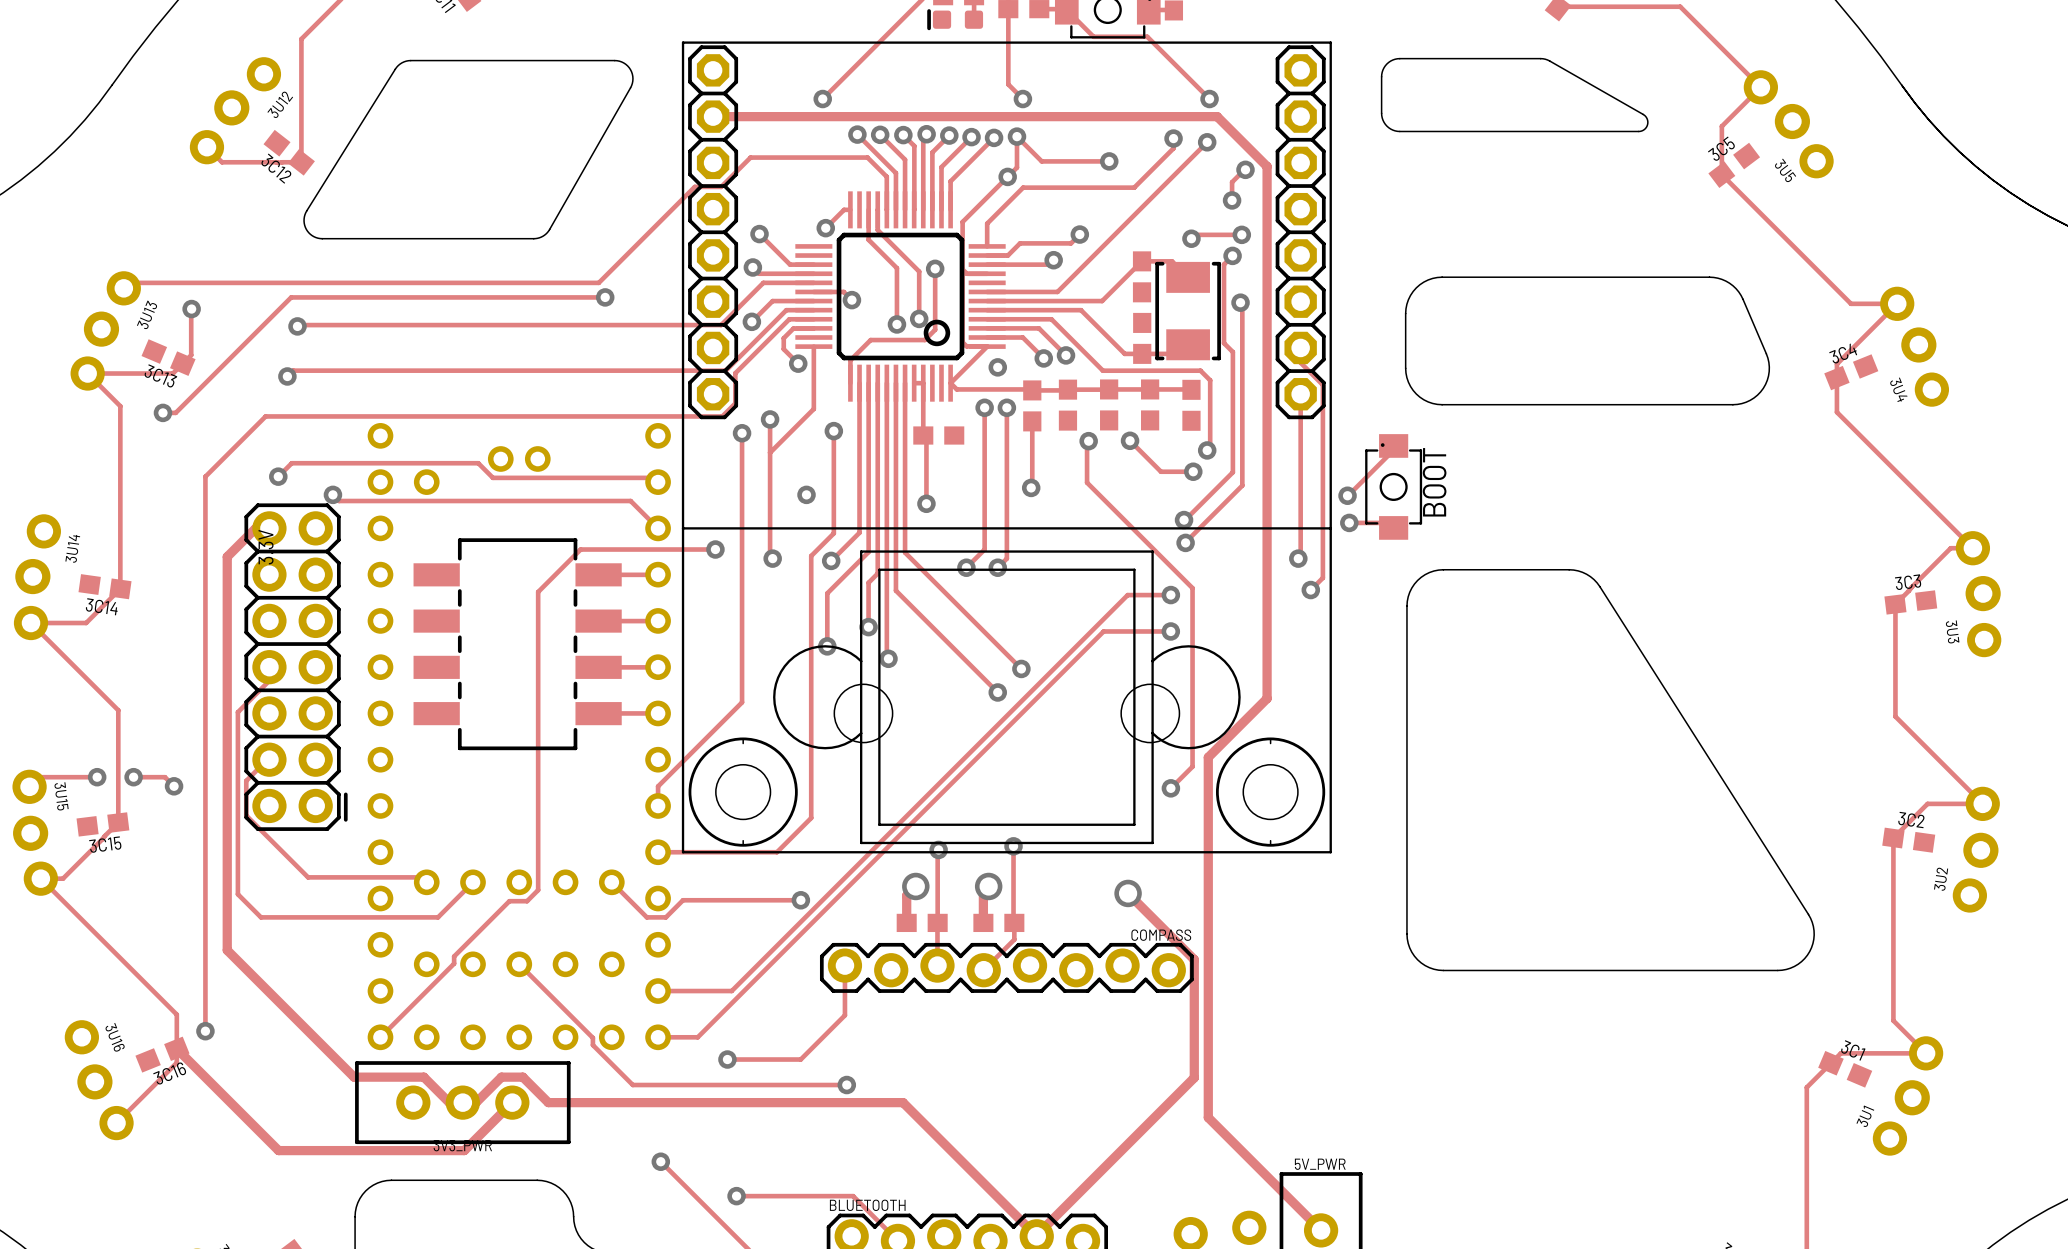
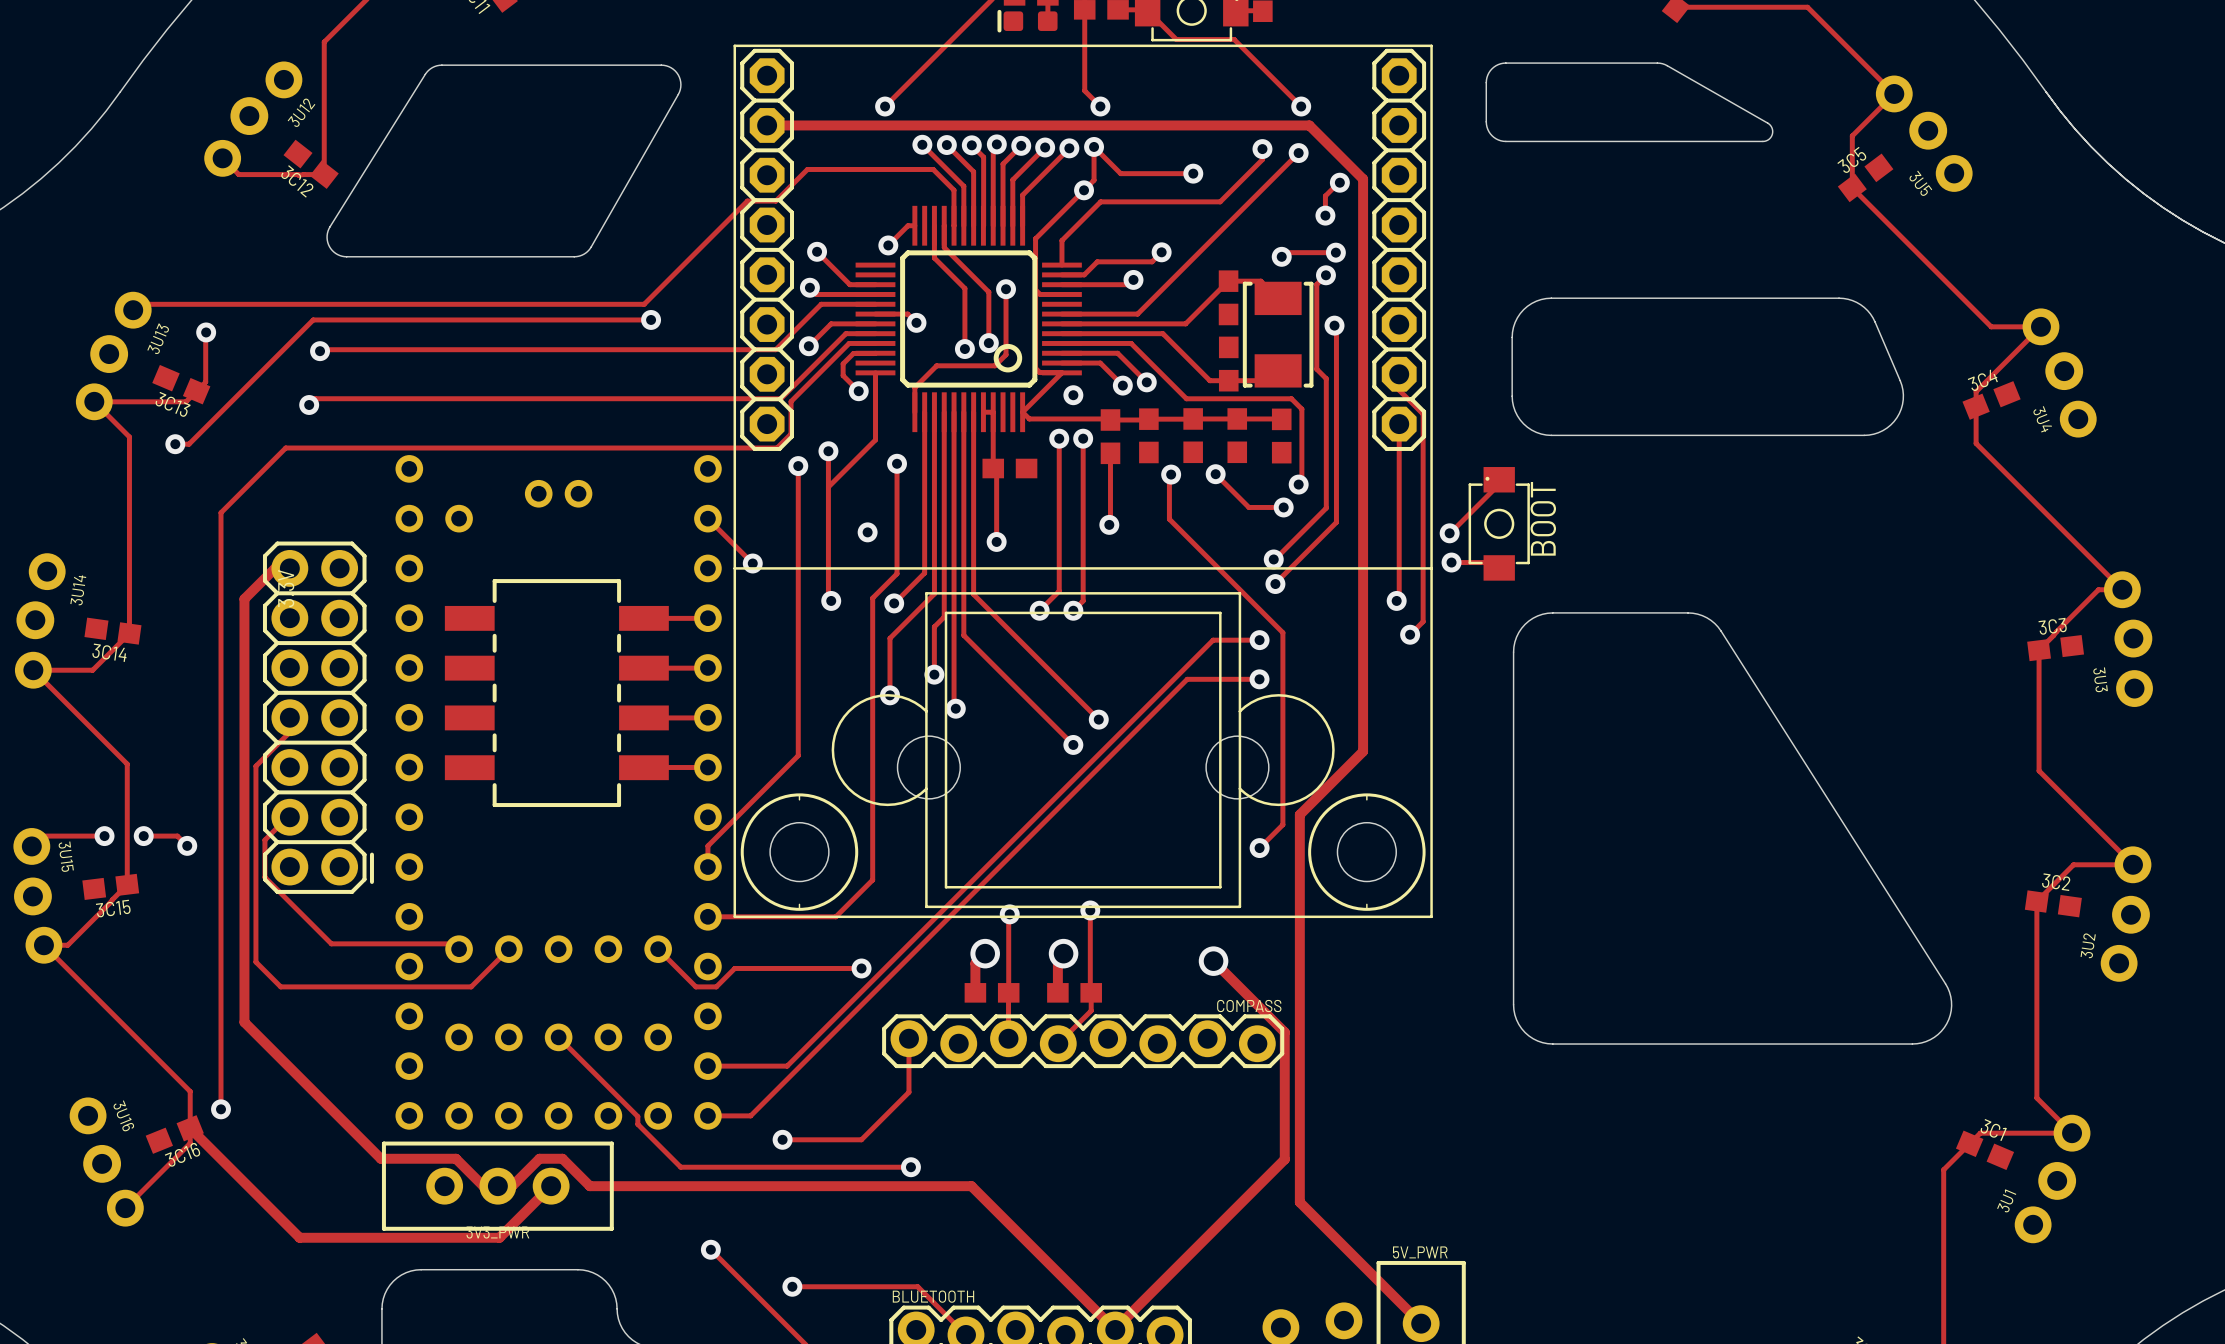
track: (278, 476) (291, 463) (478, 463) (492, 477) (653, 477) (658, 482) -> (752, 563) (707, 518)
via: (278, 476) -> none
track: (332, 494) (339, 501) (630, 501) (658, 528) -> none
via: (332, 494) -> none
track: (715, 549) (580, 549) (538, 592) (538, 890) (527, 901) (509, 901) (454, 956) (454, 963) (380, 1037) -> none
via position: (715, 549) -> (752, 563)

